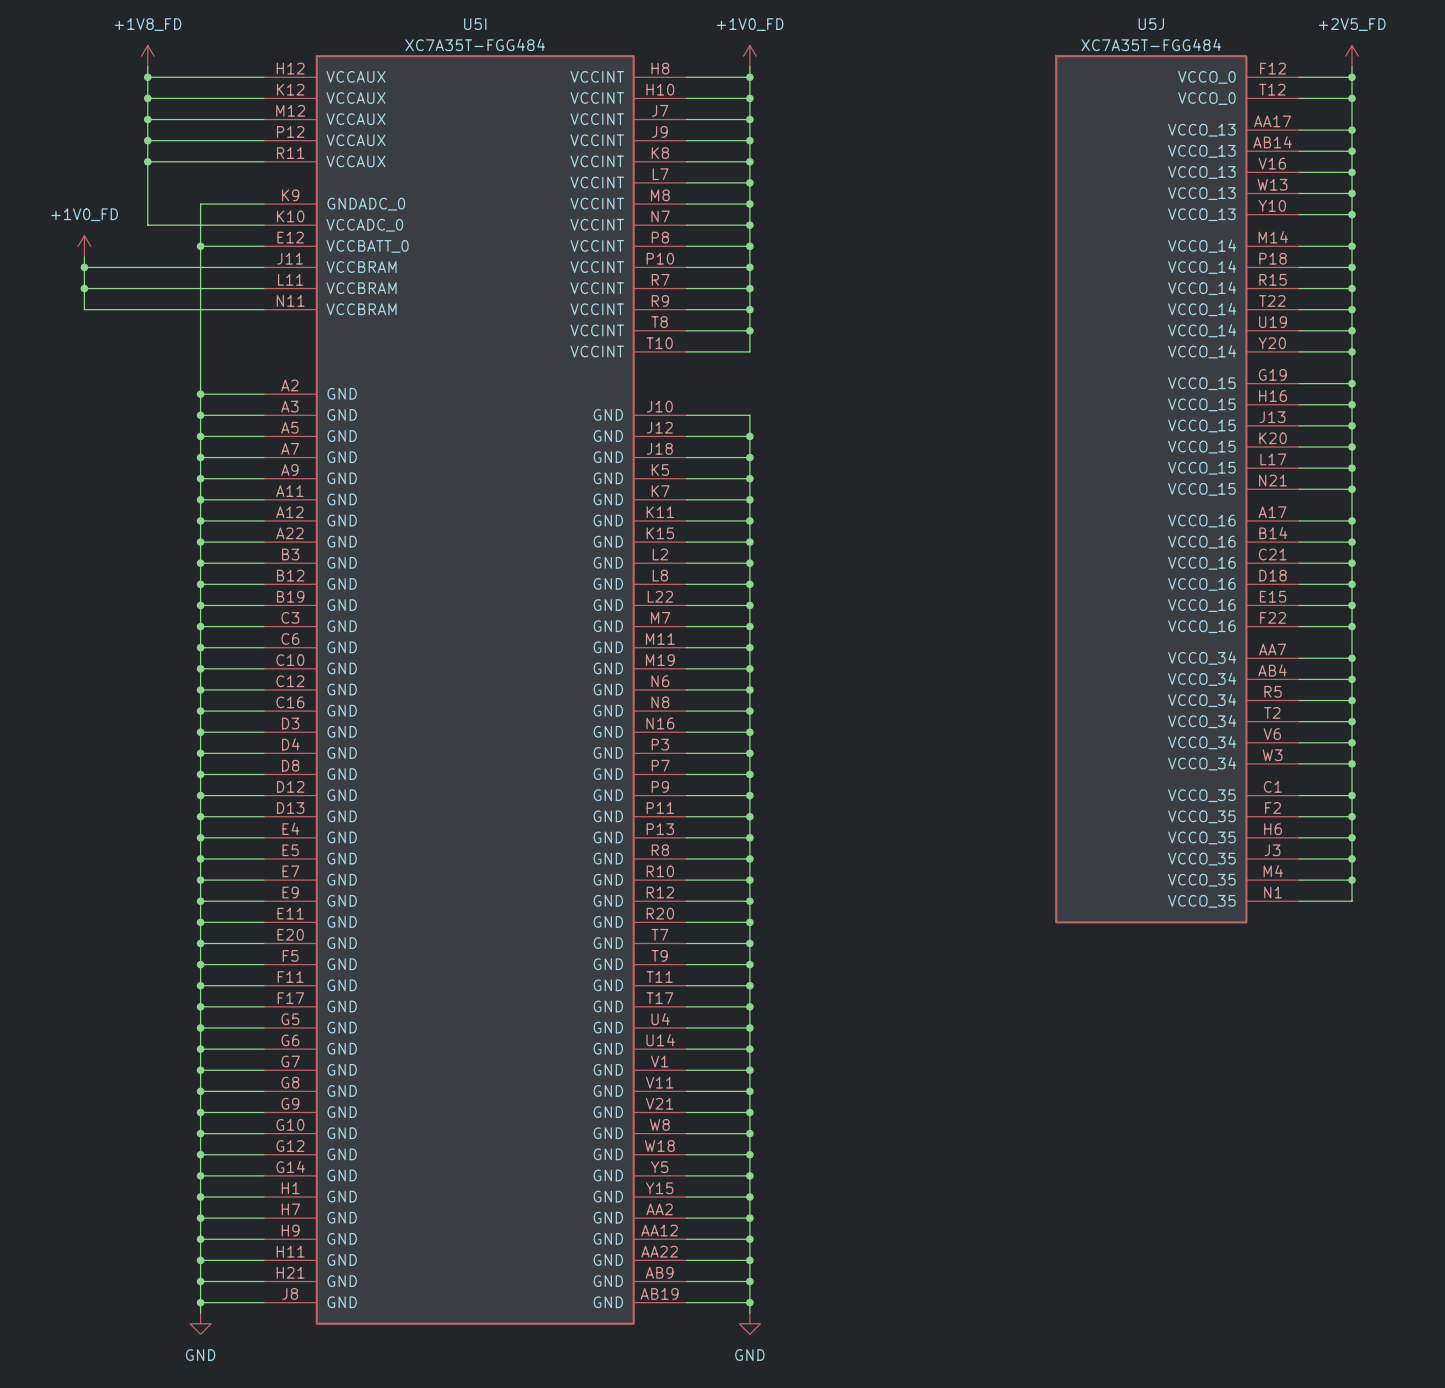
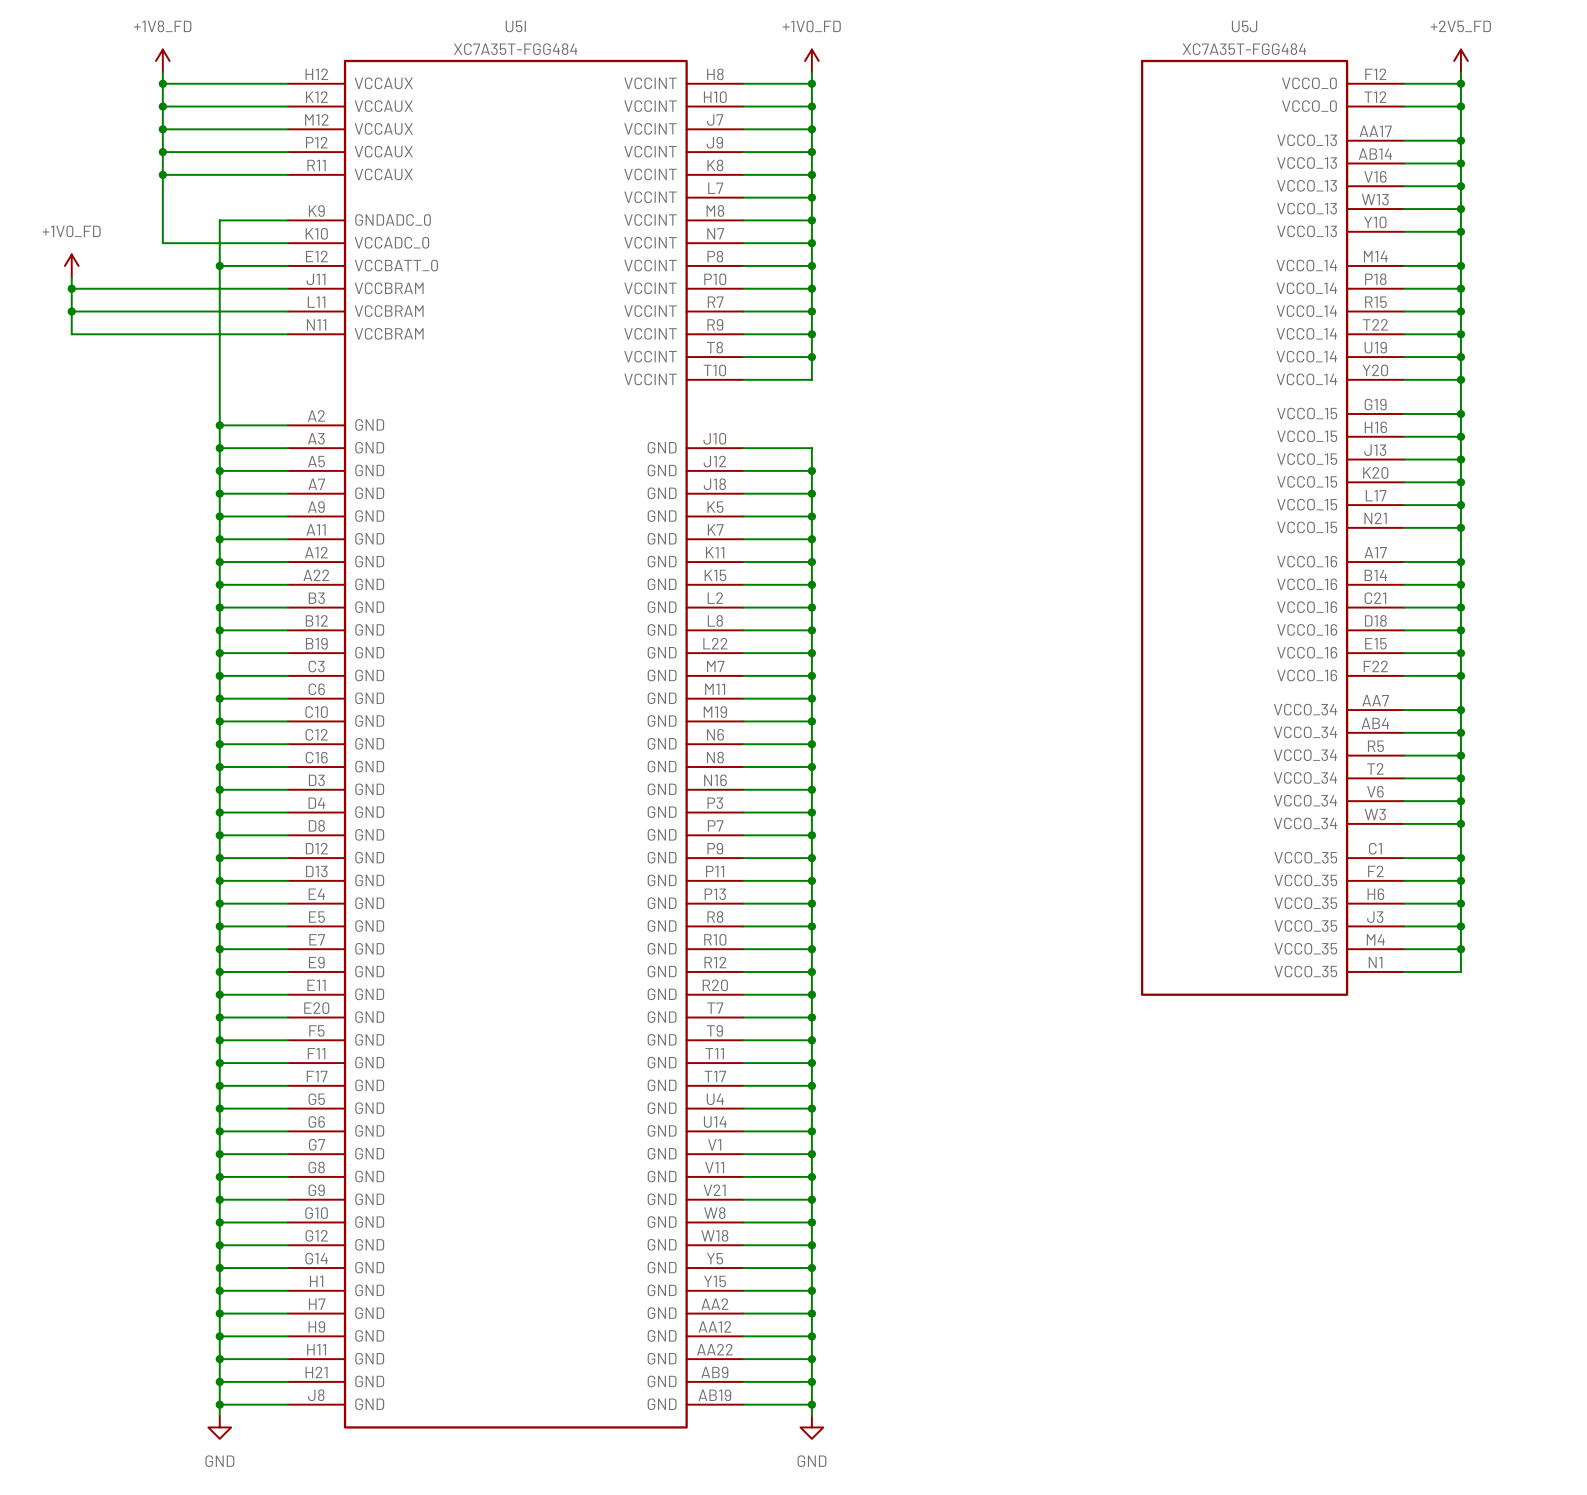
power symbol position: +1V0_FD (84, 246) -> +1V0_FD (71, 265)
wire: (84, 256) (84, 309) -> (71, 277) (71, 334) (94, 334)
wire: none -> (71, 288) (94, 288)
junction: none -> (71, 288)
junction: (84, 267) -> none
wire: none -> (71, 311) (94, 311)
junction: none -> (71, 311)
junction: (84, 288) -> none

